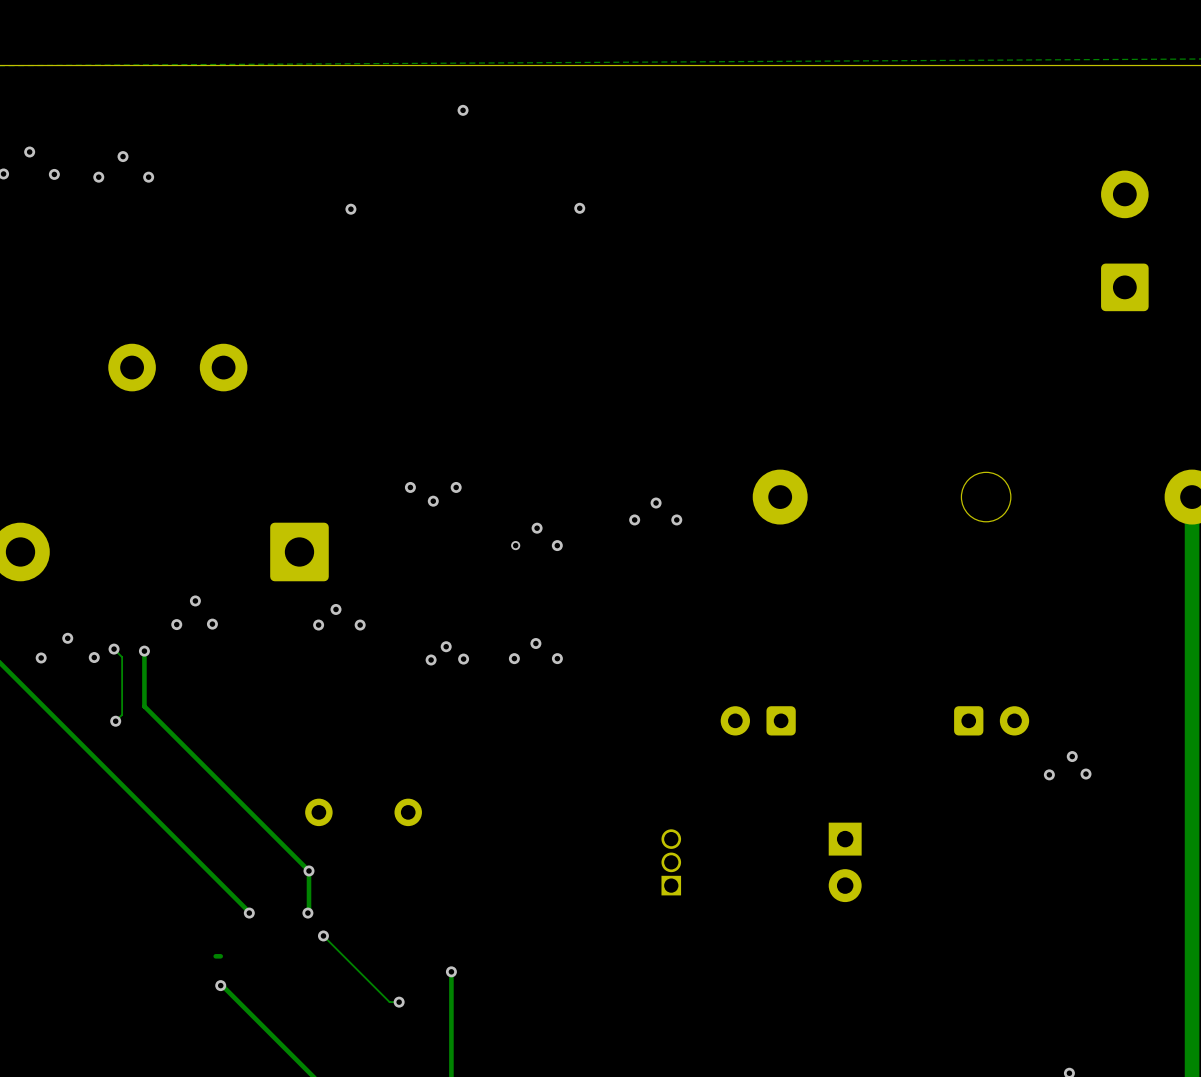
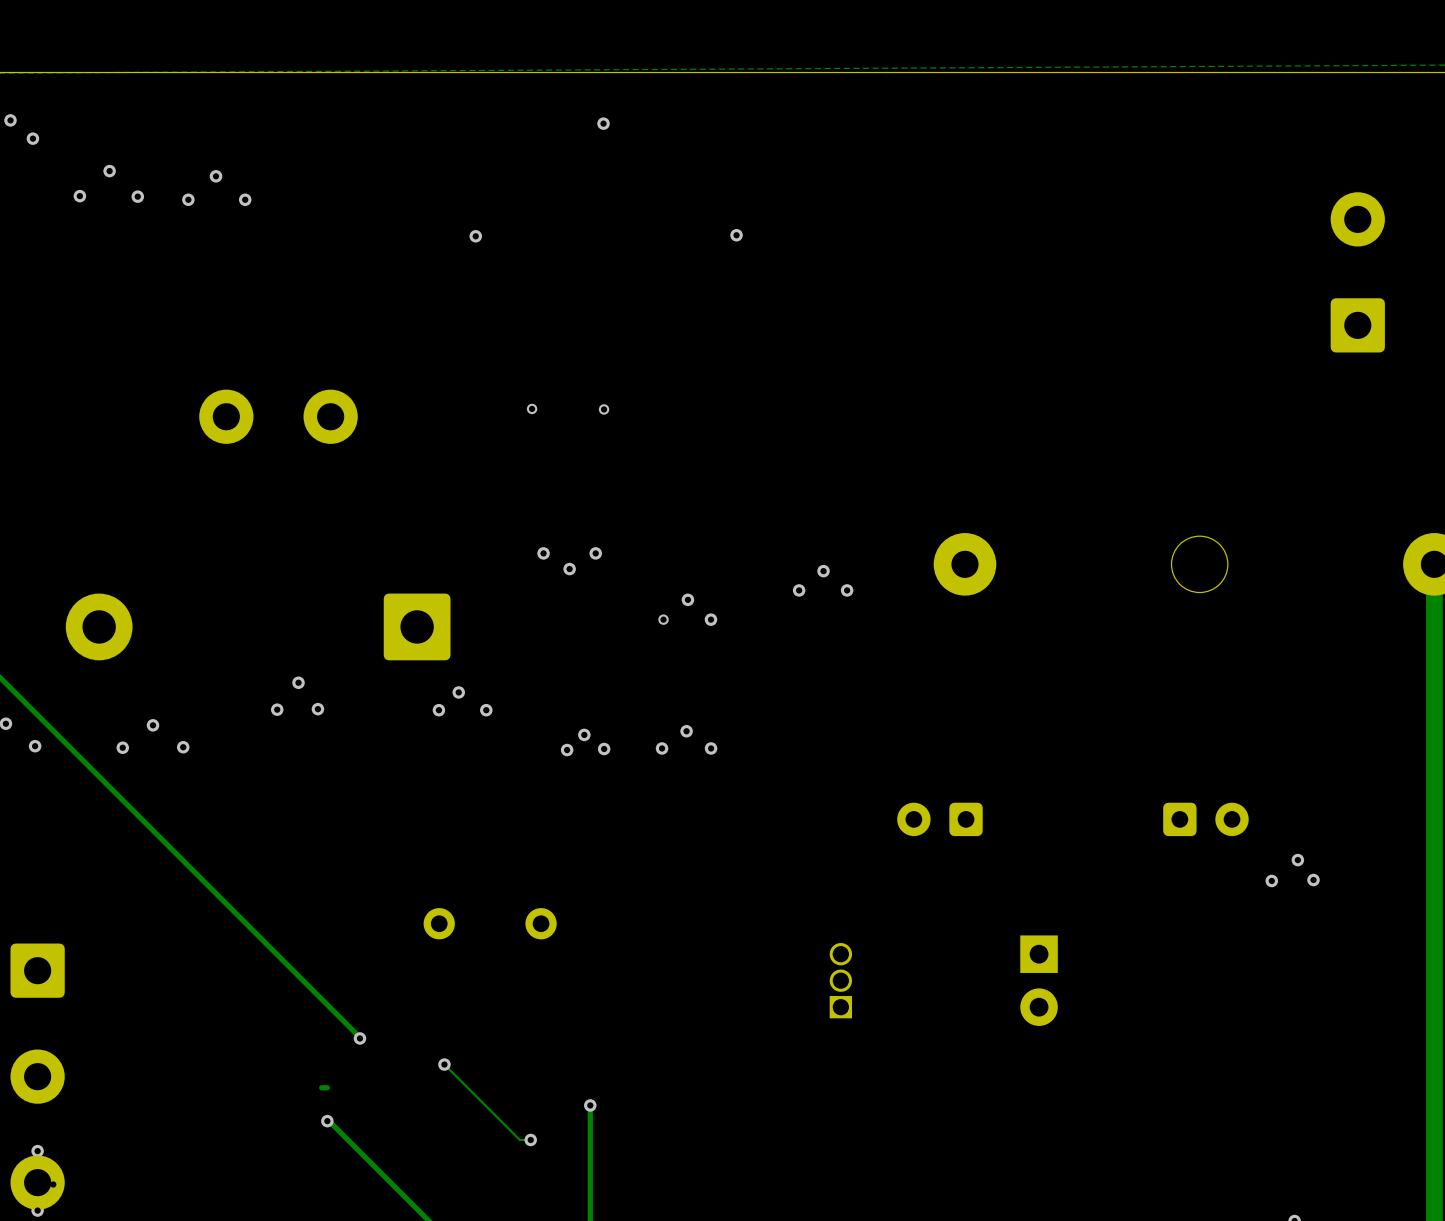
via: none -> (532, 408)
via: none -> (604, 409)
track: (114, 649) (122, 657) (122, 714) (115, 721) -> none
via: (114, 649) -> none
track: (144, 651) (144, 706) (309, 870) (307, 913) -> none
via: (144, 651) -> none
via: (115, 721) -> none
via: (309, 870) -> none
via: (307, 913) -> none

